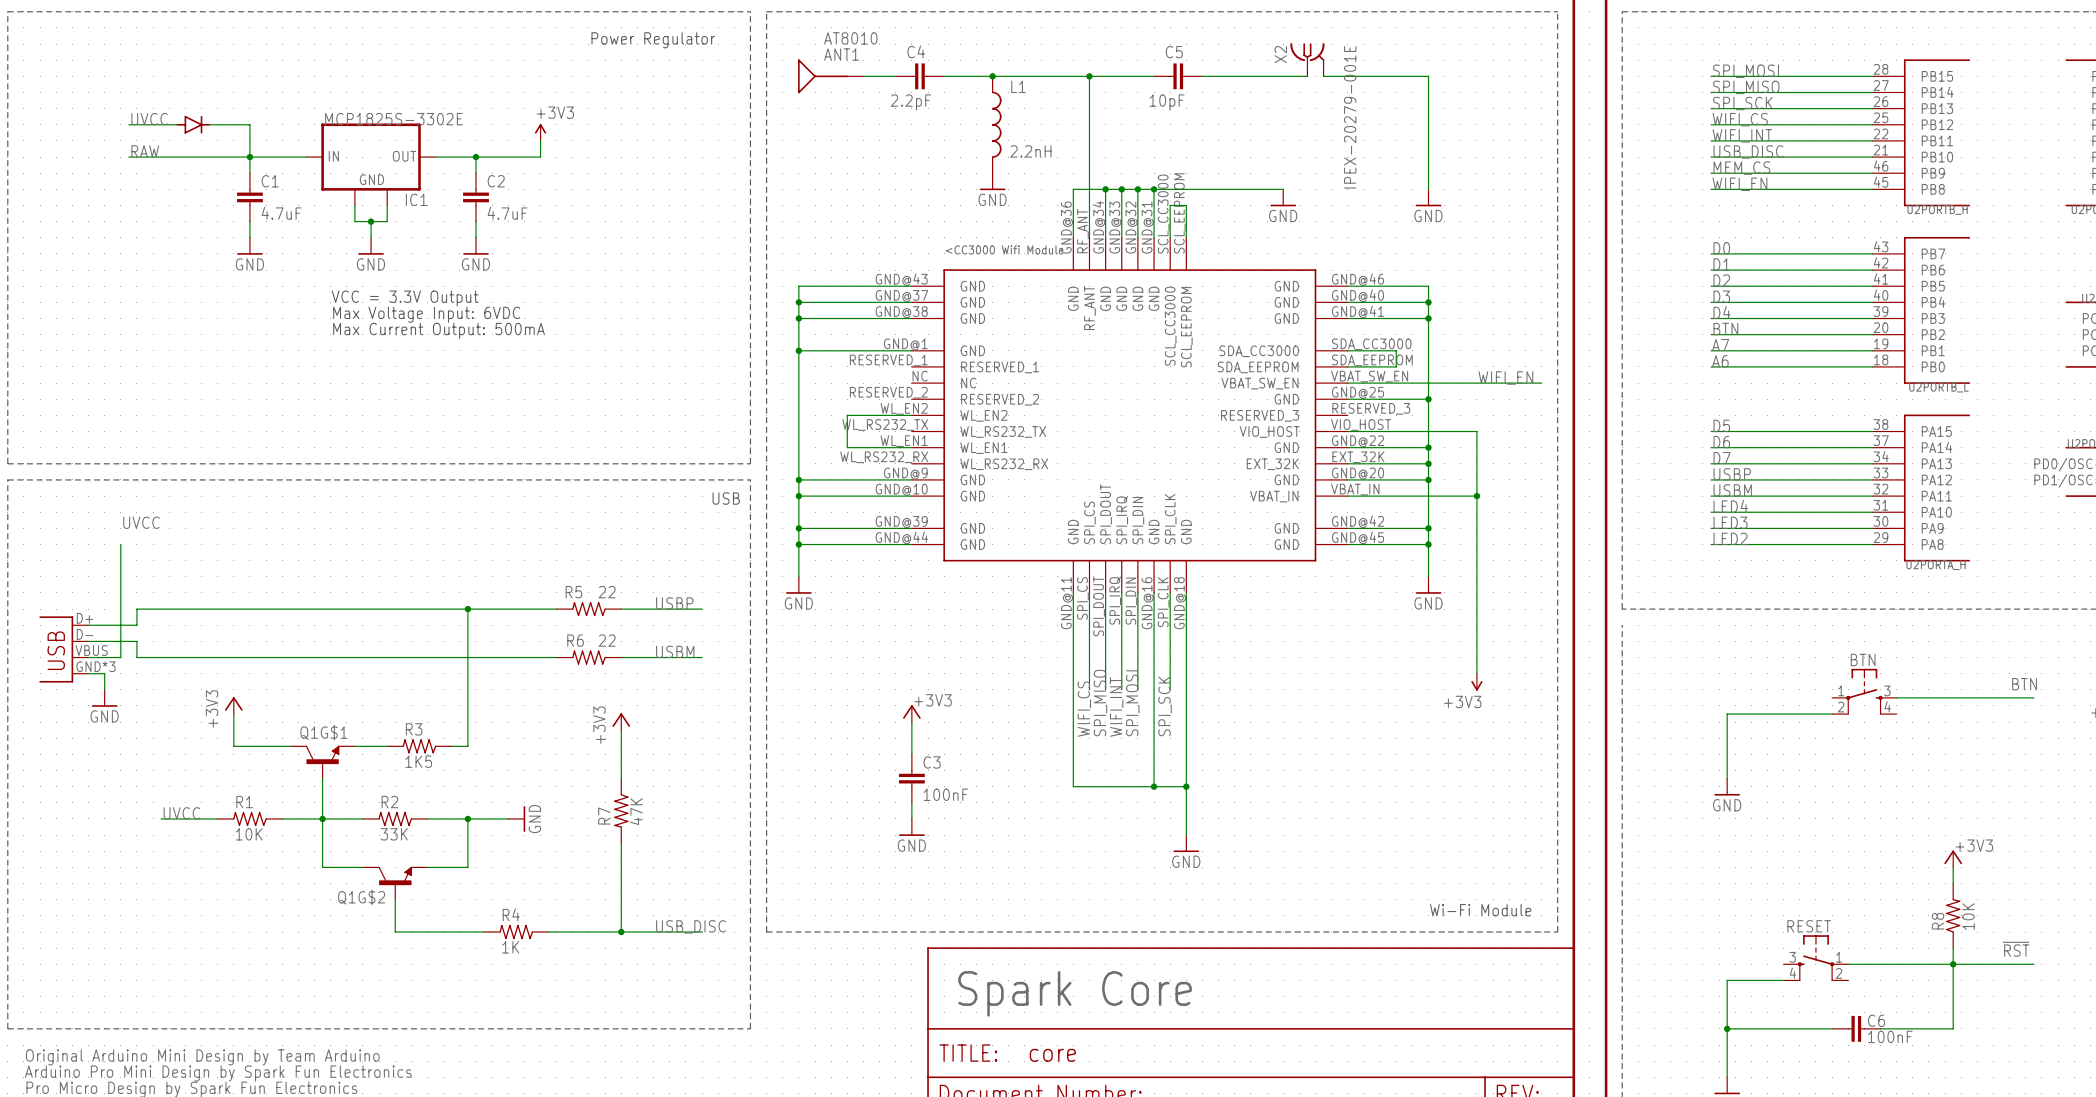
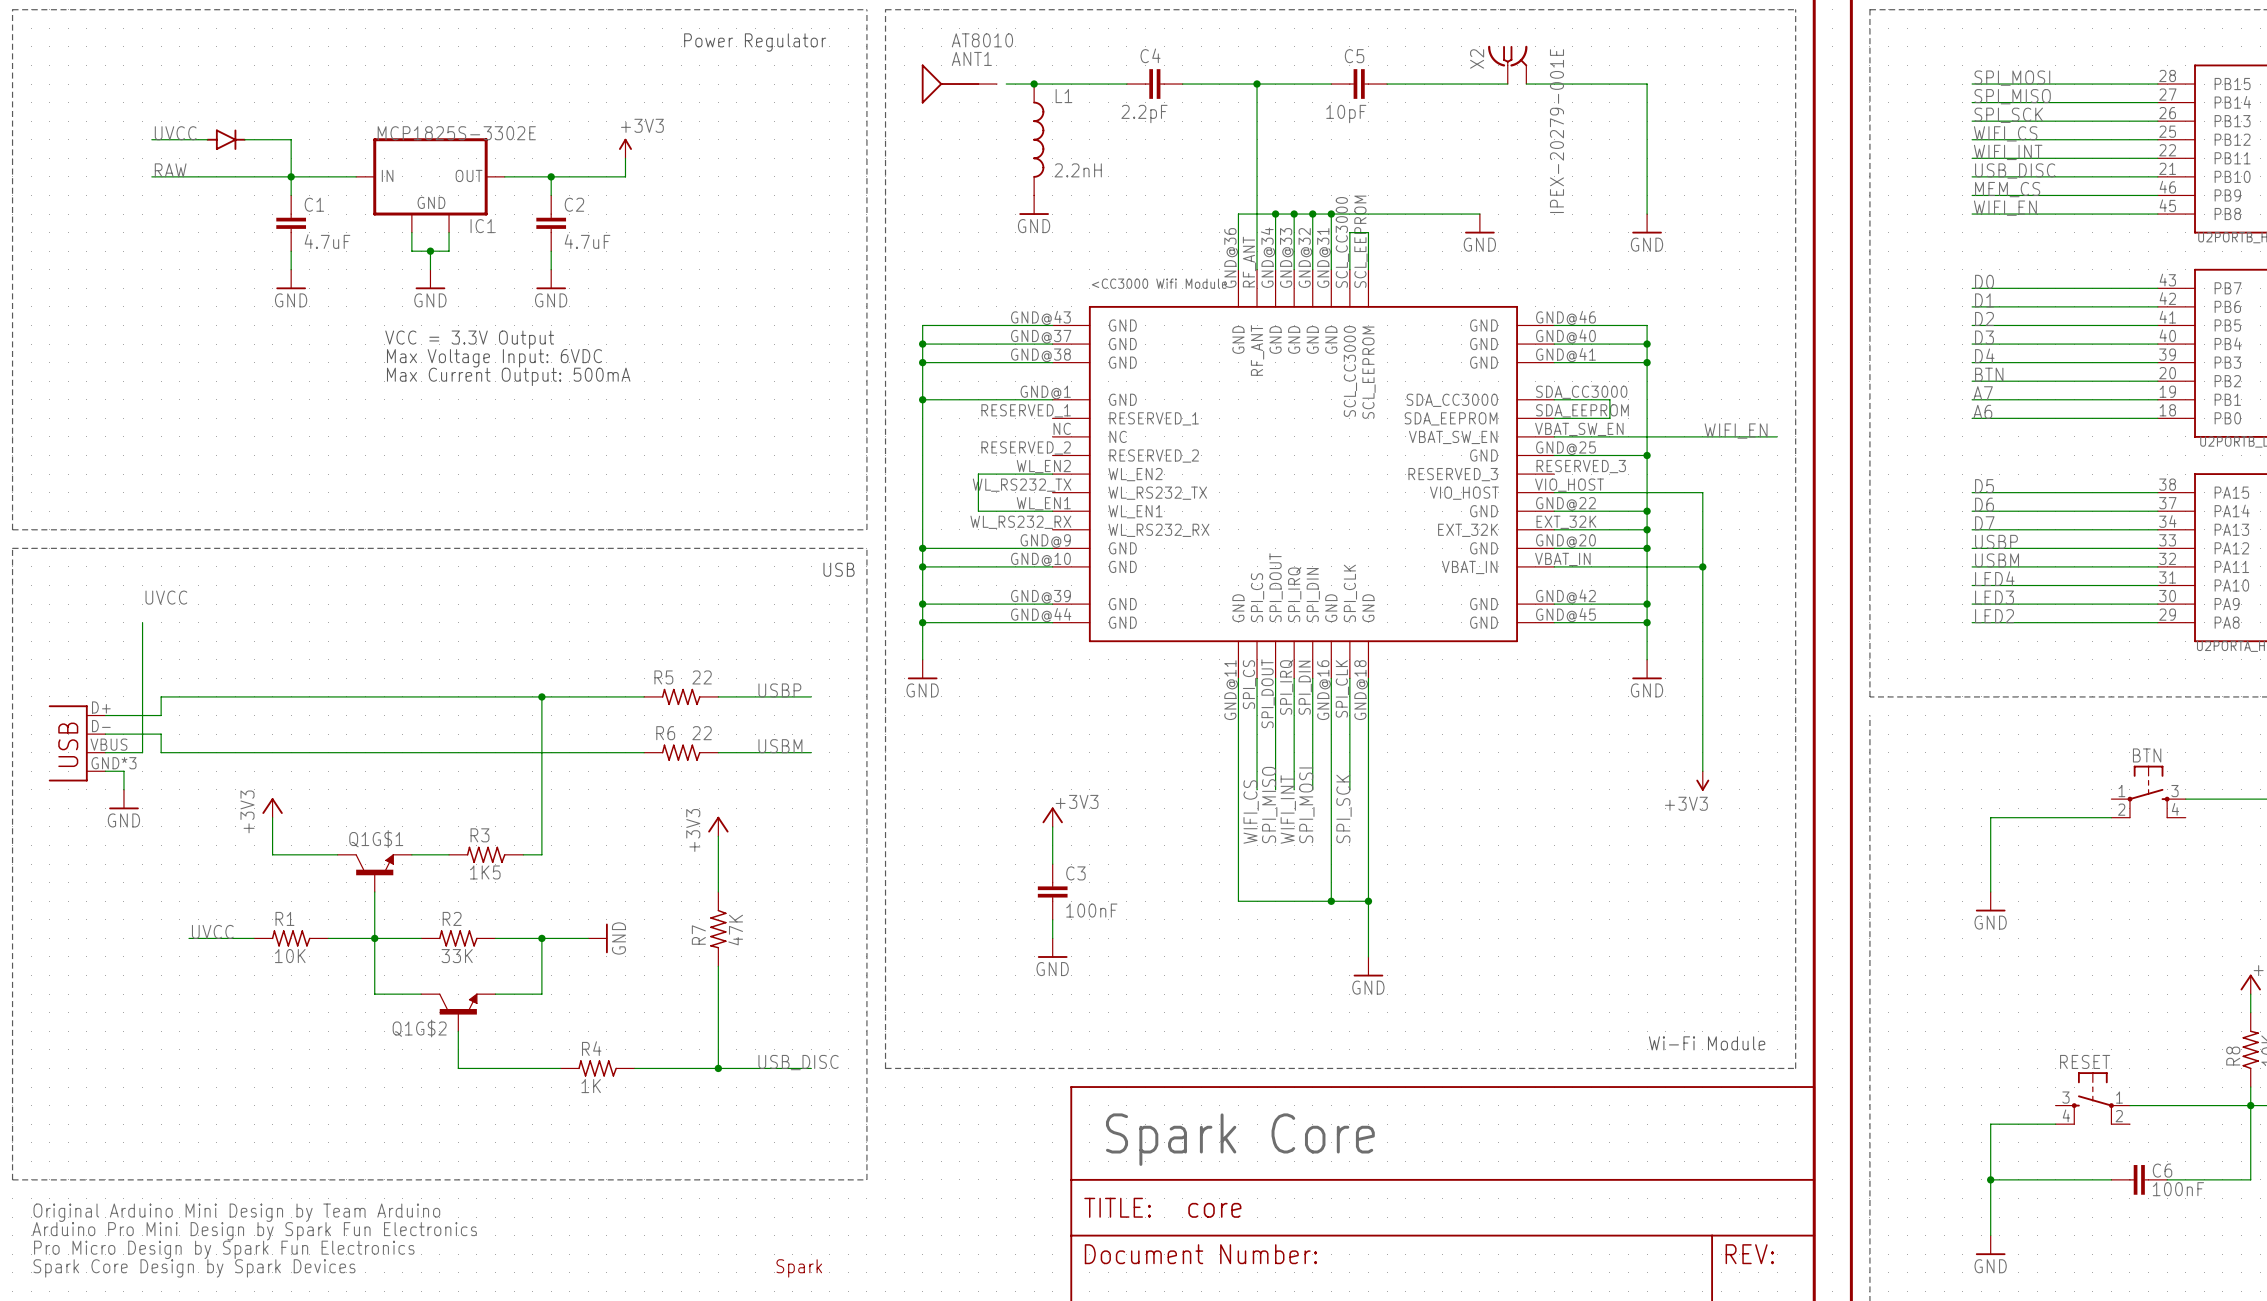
wire: (863, 76) (871, 76) -> none
junction: none -> (1034, 84)
C4 position: (919, 76) -> (1154, 84)
junction: (992, 76) -> none
L1 position: (996, 124) -> (1038, 139)
power symbol position: GND (992, 181) -> GND (1034, 205)

